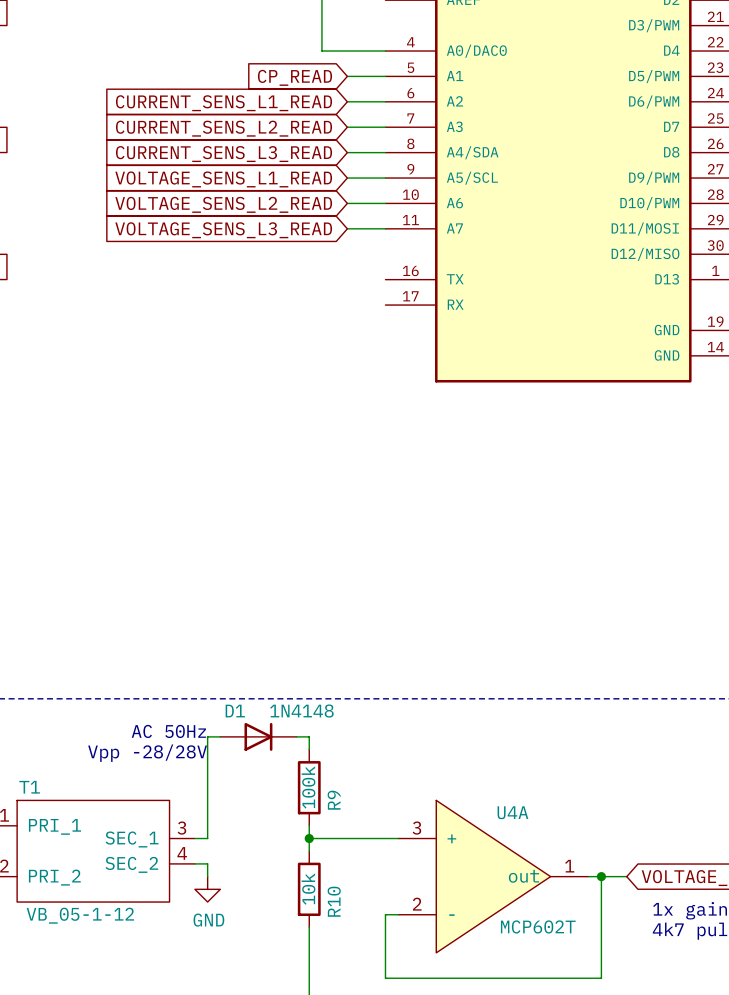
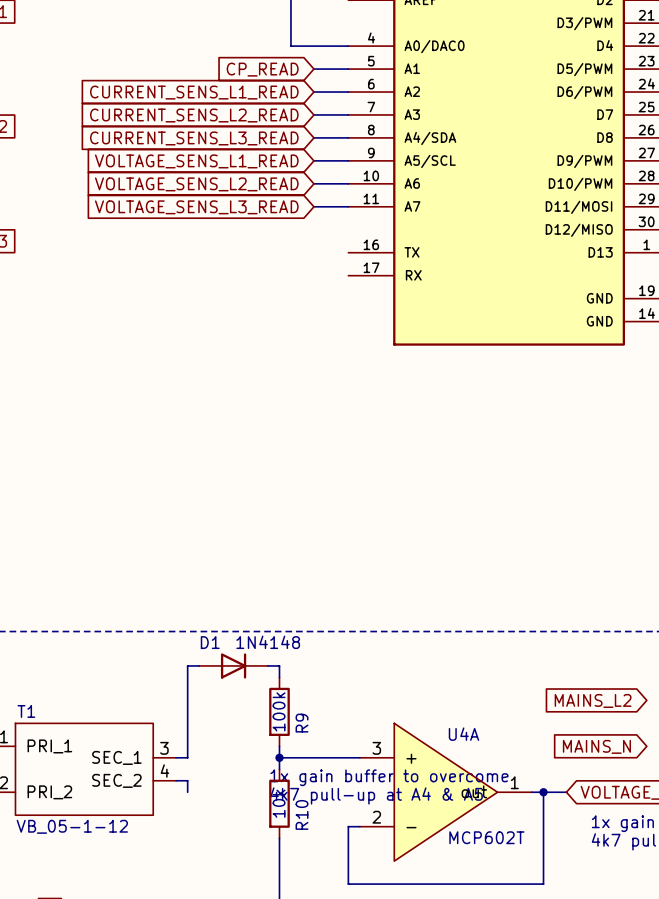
text: AC 50Hz (168, 731) -> none
text: Vpp -28/28V (147, 753) -> none
global label: none -> MAINS_L2 (593, 700)
global label: none -> MAINS_N (596, 746)
text: none -> 1x gain buffer to overcome (389, 777)
text: none -> 4k7 pull-up at A4 & A5 (376, 795)
power symbol: GND (207, 889) -> none

